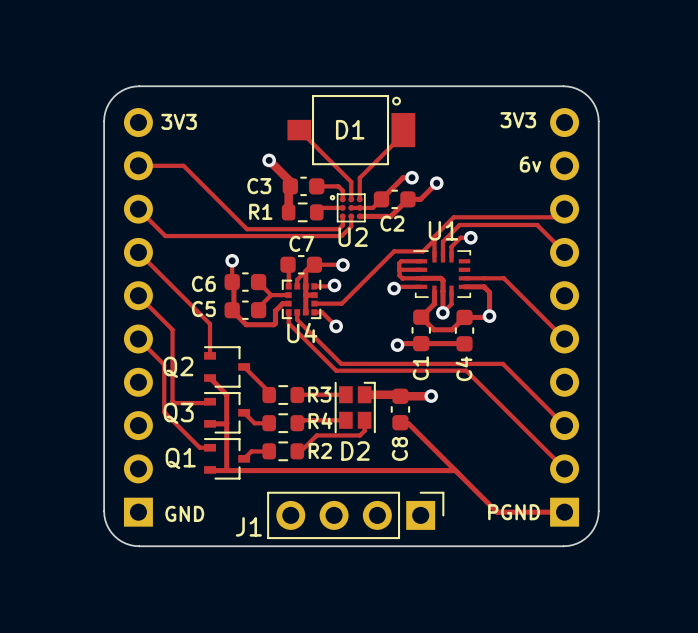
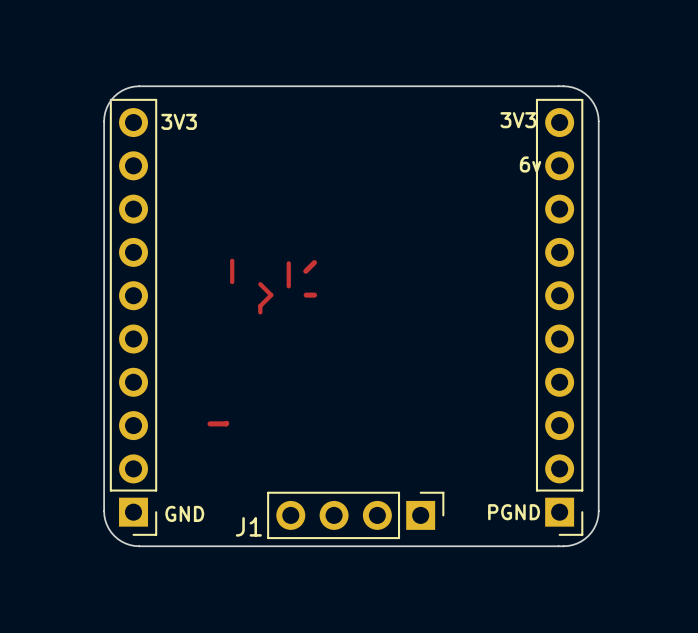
track: (299, 130) (351, 181) (351, 199) -> none
D1: (351, 130) -> none
track: (403, 130) (403, 134) (359, 177) (359, 199) -> none
track: (269, 160) (290, 181) (288, 212) -> none
via: (269, 160) -> none
track: (138, 165) (183, 165) (247, 229) (338, 229) (342, 225) (342, 216) -> none
track: (412, 177) (403, 177) (372, 207) (351, 207) -> none
via: (412, 177) -> none
track: (436, 183) (420, 199) (407, 199) (390, 216) (359, 216) -> none
via: (436, 183) -> none
C3: (303, 186) -> none
track: (316, 186) (338, 186) (342, 190) (342, 199) -> none
C2: (394, 199) -> none
track: (342, 207) (321, 207) (316, 212) -> none
U2: (347, 207) -> none
track: (138, 209) (165, 236) (341, 236) (351, 226) (351, 216) -> none
track: (564, 209) (556, 217) (453, 217) (434, 236) (434, 256) -> none
R1: (302, 212) -> none
track: (470, 237) (460, 237) (451, 246) (451, 256) -> none
via: (470, 237) -> none
track: (434, 240) (423, 251) (394, 251) (341, 303) (314, 303) -> none
track: (138, 252) (210, 324) (210, 355) -> none
track: (564, 252) (537, 224) (459, 224) (442, 241) (442, 256) -> none
via: (232, 260) -> none
track: (421, 261) (401, 261) (399, 263) (399, 269) -> none
C7: (301, 264) -> none
track: (314, 264) (342, 265) -> none
via: (342, 265) -> none
track: (399, 269) (421, 269) -> none
track: (399, 269) (399, 275) (402, 278) (440, 278) (442, 280) (442, 312) -> none
U1: (442, 274) -> none
track: (464, 278) (503, 278) (564, 339) -> none
C6: (245, 282) -> none
track: (233, 284) (233, 312) (246, 324) (273, 324) (275, 310) (282, 303) (288, 303) -> none
track: (334, 285) (314, 286) -> none
via: (334, 285) -> none
track: (297, 286) (297, 279) (305, 271) (305, 312) -> none
track: (421, 286) (395, 286) (394, 288) -> none
track: (464, 286) (484, 286) (489, 292) (489, 316) (464, 317) (452, 329) (433, 329) (421, 317) (434, 303) (434, 291) -> none
via: (394, 288) -> none
track: (451, 291) (451, 304) (442, 312) -> none
track: (138, 295) (172, 329) (172, 401) (210, 401) -> none
track: (271, 295) (288, 295) -> none
U4: (301, 299) -> none
C5: (245, 310) -> none
track: (288, 312) (288, 323) (336, 370) (466, 370) (564, 468) -> none
track: (297, 312) (297, 319) (341, 363) (502, 363) (564, 425) -> none
track: (314, 312) (322, 312) (336, 326) -> none
via: (442, 312) -> none
via: (489, 316) -> none
part side: bottom (138, 317) -> top (133, 317)
part side: bottom (564, 317) -> top (559, 317)
via: (336, 326) -> none
C1: (421, 330) -> none
C4: (464, 330) -> none
track: (138, 339) (164, 364) (164, 412) (199, 447) (210, 447) -> none
track: (464, 343) (397, 345) -> none
via: (397, 345) -> none
Q2: (226, 366) -> none
track: (244, 366) (272, 395) -> none
track: (210, 378) (226, 394) (226, 470) -> none
track: (345, 394) (300, 395) -> none
track: (364, 394) (431, 396) -> none
R3: (283, 395) -> none
via: (431, 396) -> none
D2: (355, 407) -> none
C8: (400, 409) -> none
Q3: (226, 412) -> none
track: (244, 412) (254, 423) (272, 423) -> none
track: (345, 420) (303, 420) (300, 423) -> none
track: (364, 420) (364, 430) (360, 435) (316, 435) (300, 451) -> none
R4: (283, 423) -> none
track: (408, 423) (497, 512) (564, 512) -> none
track: (272, 451) (251, 451) (244, 458) -> none
R2: (283, 451) -> none
Q1: (226, 458) -> none
track: (210, 469) (455, 470) (457, 472) -> none

